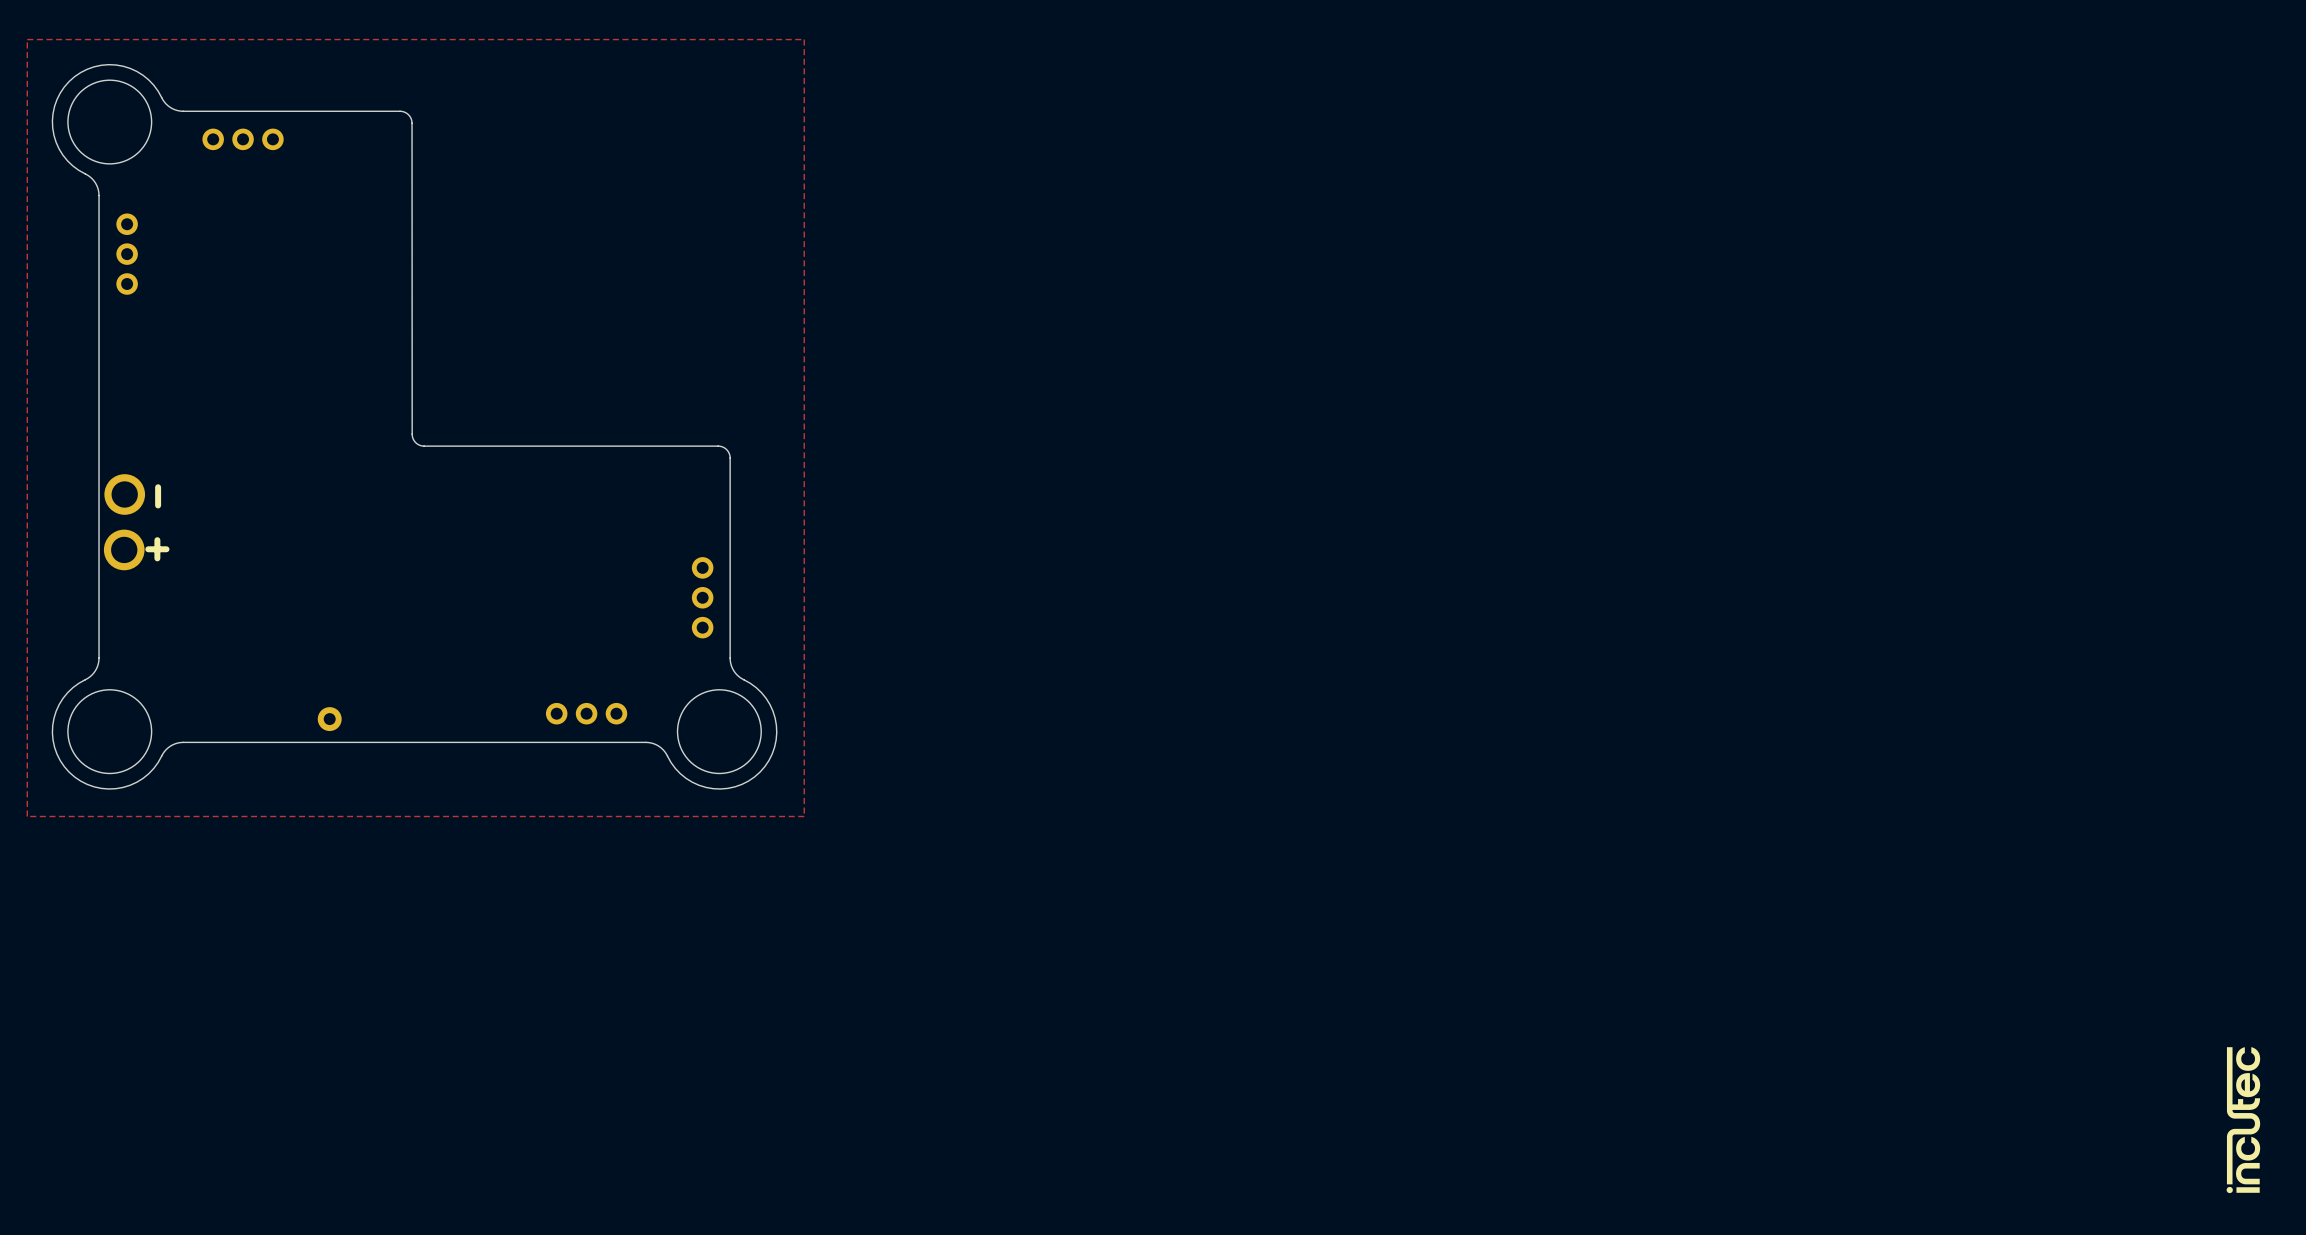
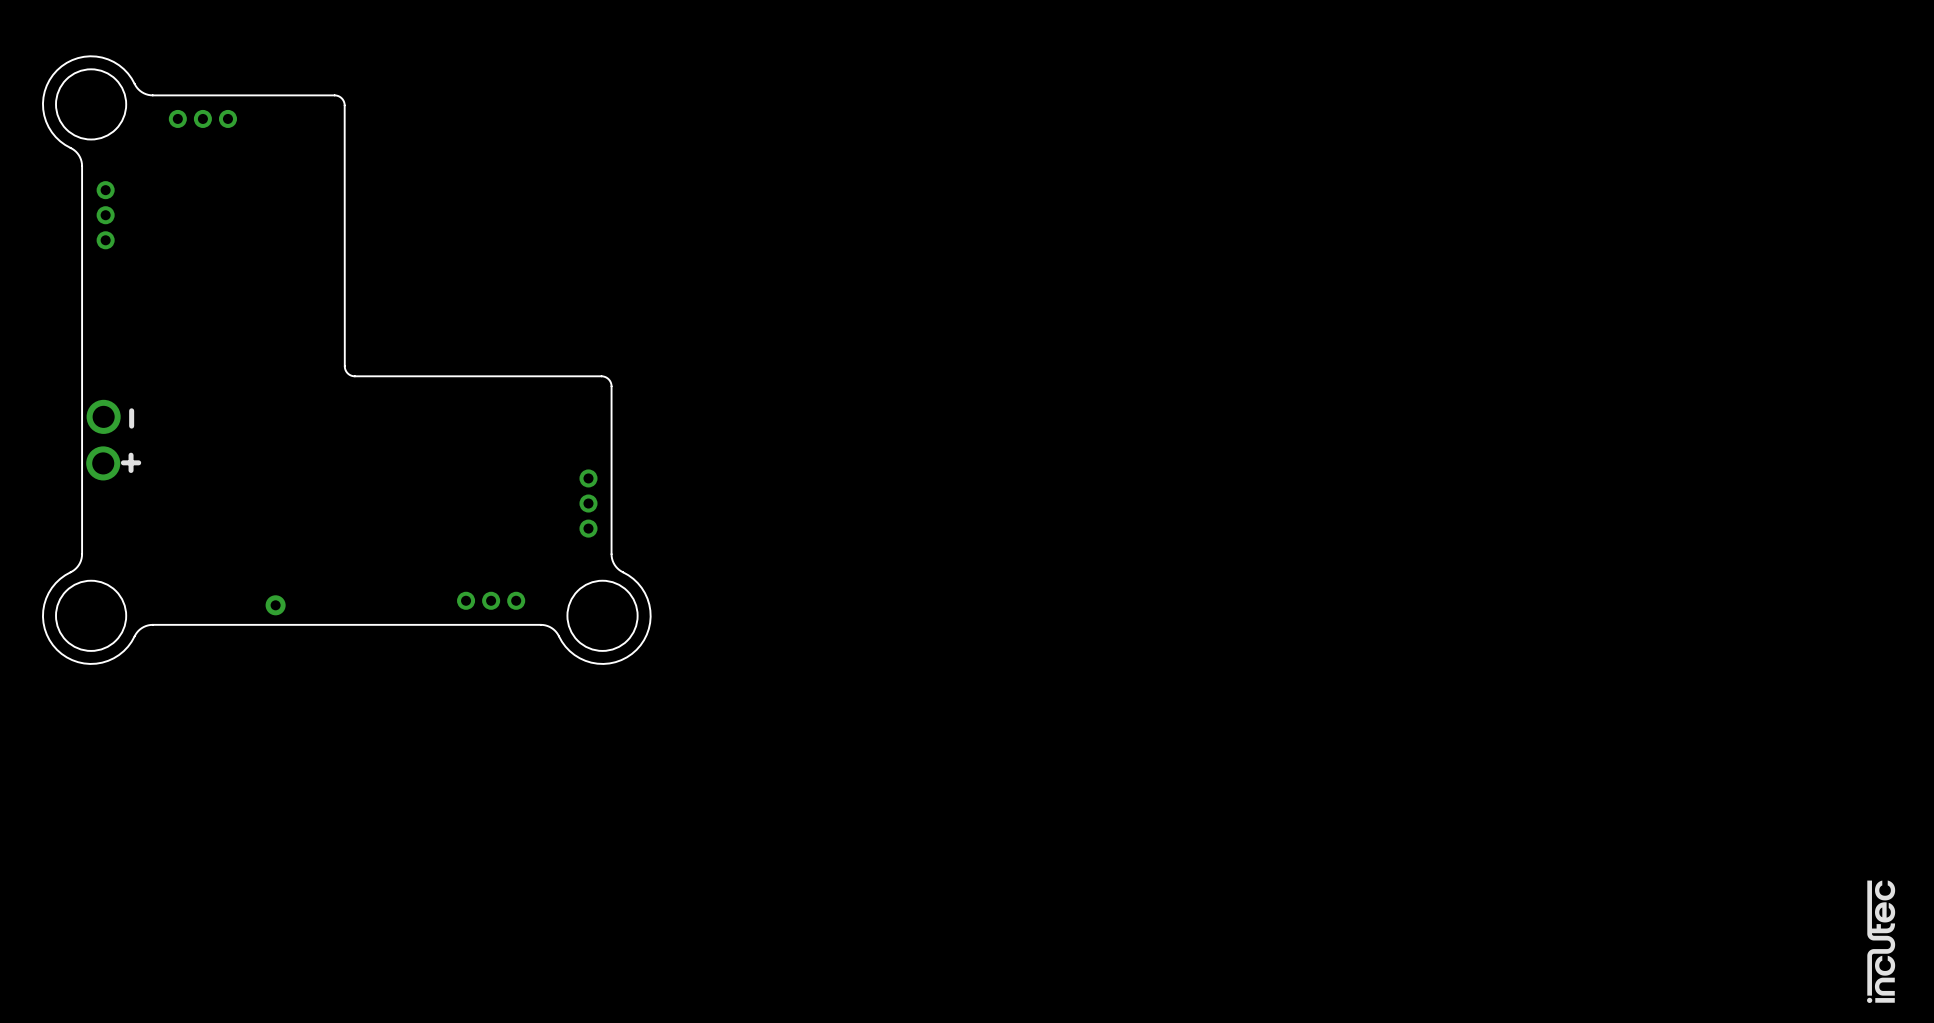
zone outline: (27, 39) (27, 816) (804, 816) (804, 39) (27, 39) -> none

